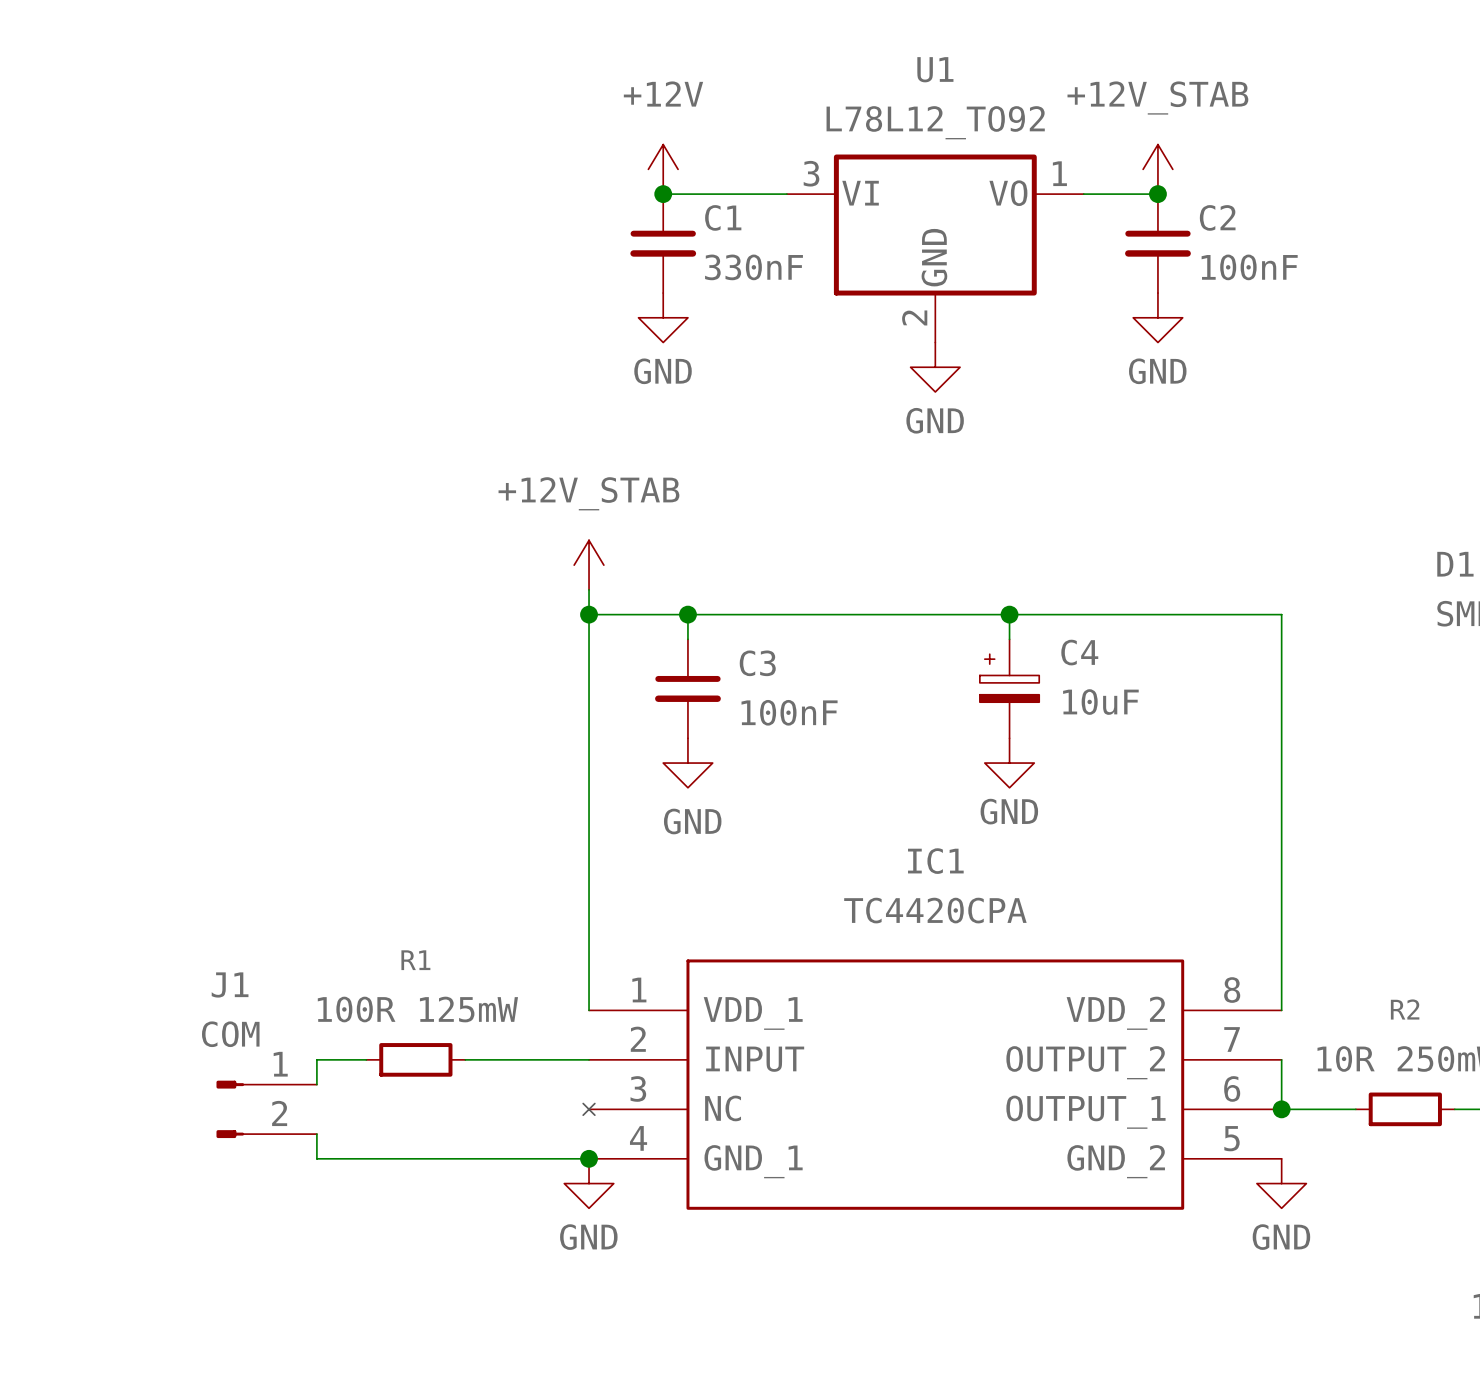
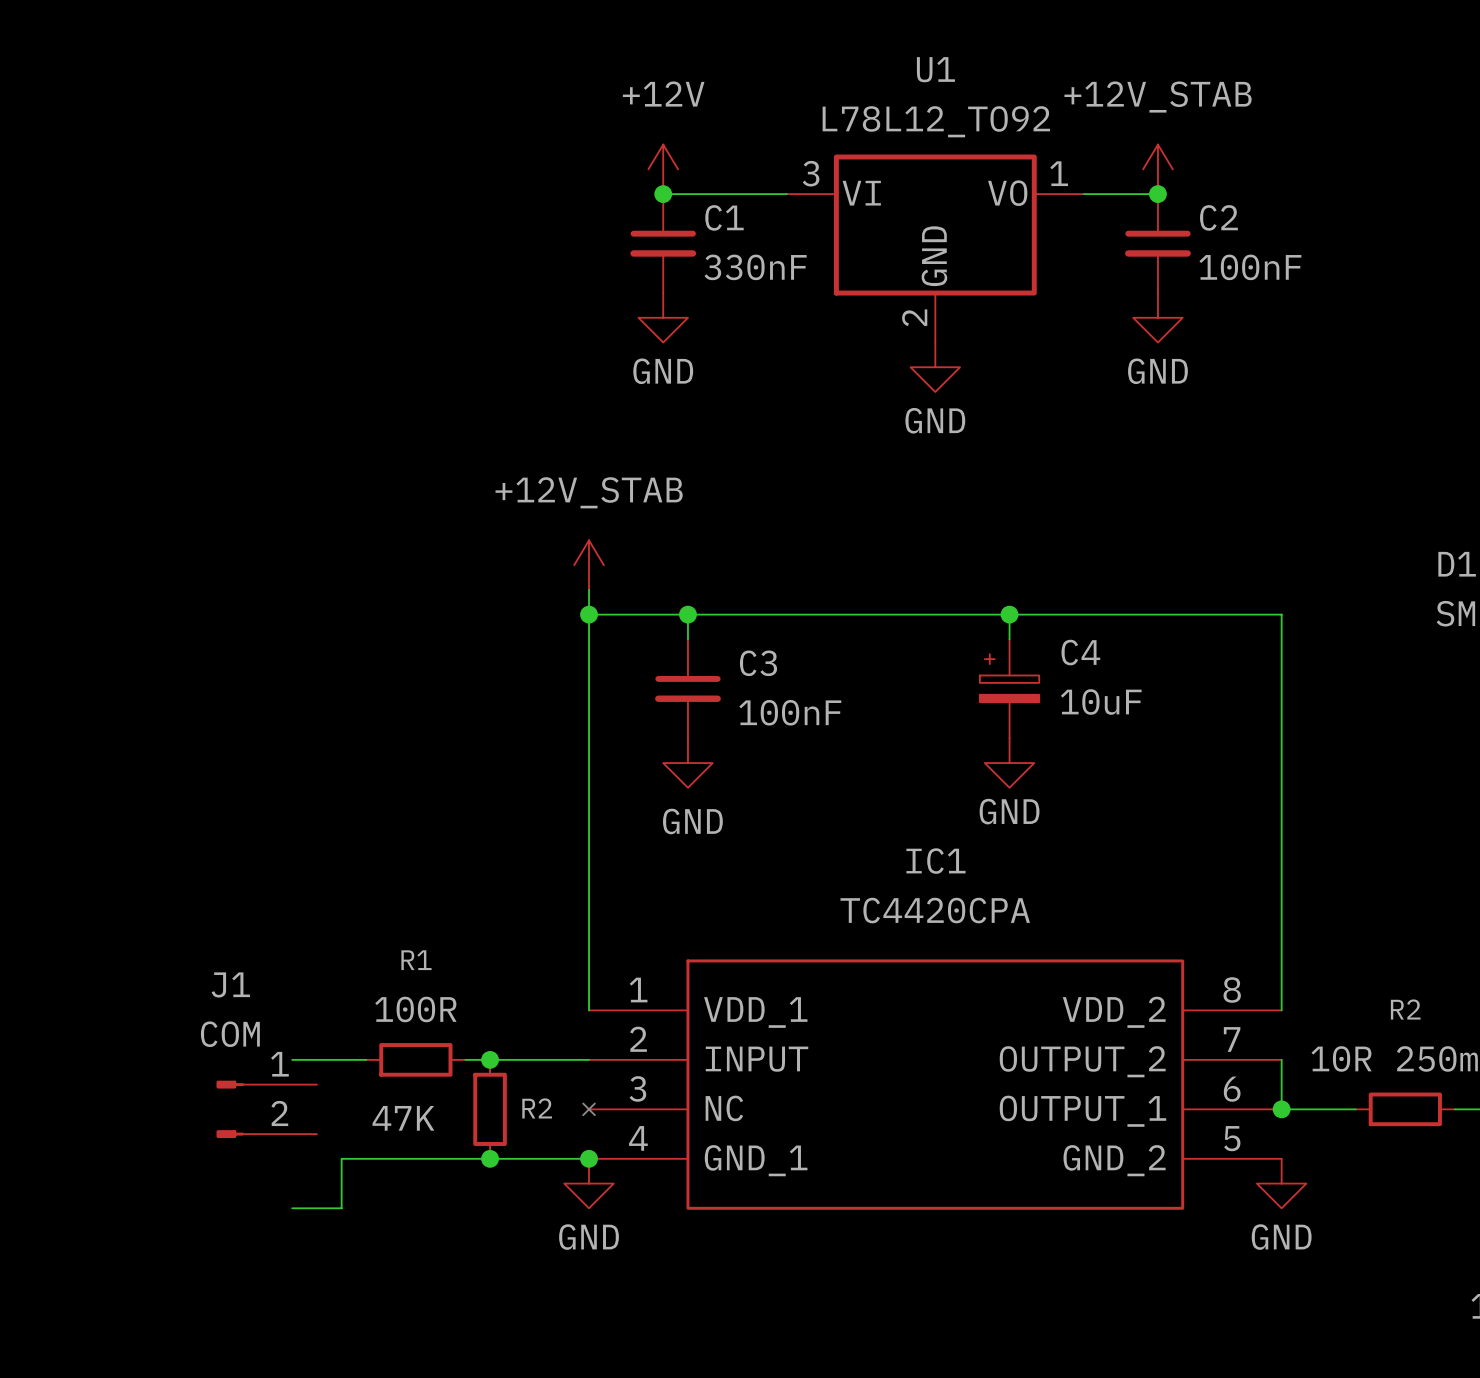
R1 value: 100R 125mW (417, 1009) -> 100R (415, 1009)
wire: (316, 1059) (316, 1084) -> (316, 1059) (292, 1059)
junction: none -> (490, 1059)
R2: none -> 47K (490, 1109)
wire: (316, 1134) (316, 1158) (341, 1158) -> (292, 1208) (341, 1208) (341, 1158)
junction: none -> (490, 1158)

